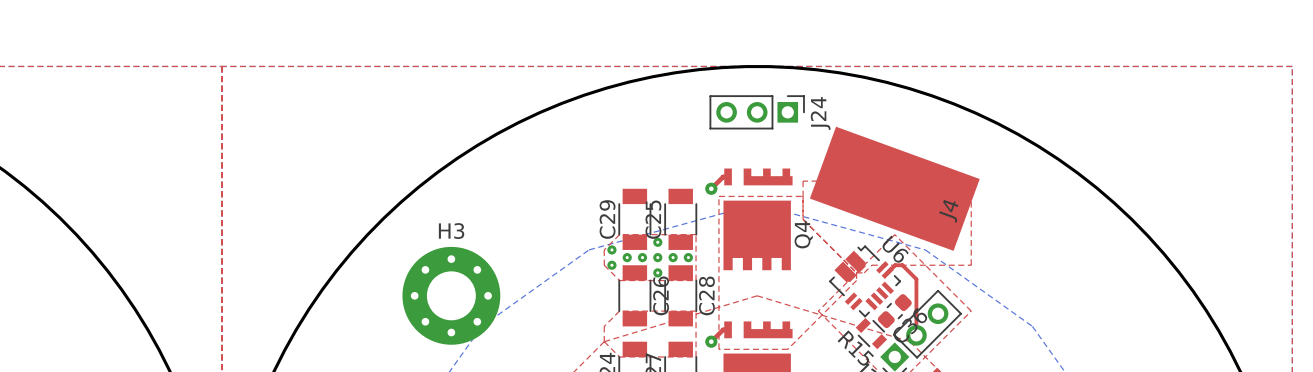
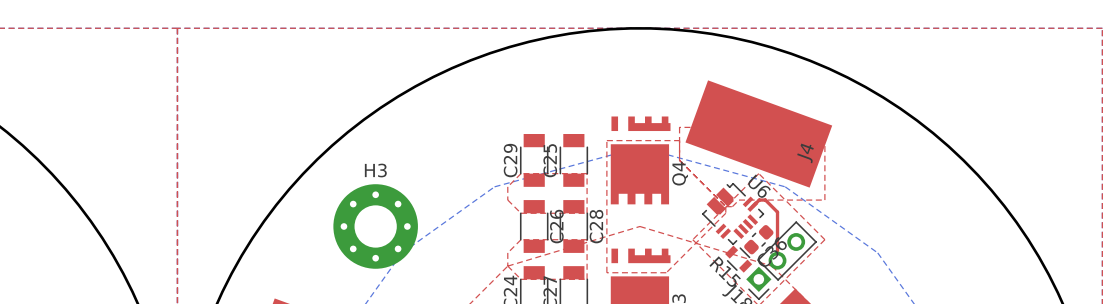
J24: (757, 112) -> none
top track: (728, 176) (723, 176) (711, 188) -> none
via: (711, 188) -> none
via: (657, 242) -> none
via: (611, 249) -> none
via: (627, 257) -> none
via: (642, 257) -> none
via: (657, 257) -> none
via: (673, 257) -> none
via: (688, 257) -> none
via: (611, 265) -> none
via: (657, 272) -> none
top track: (728, 329) (723, 329) (711, 341) -> none
via: (711, 341) -> none

